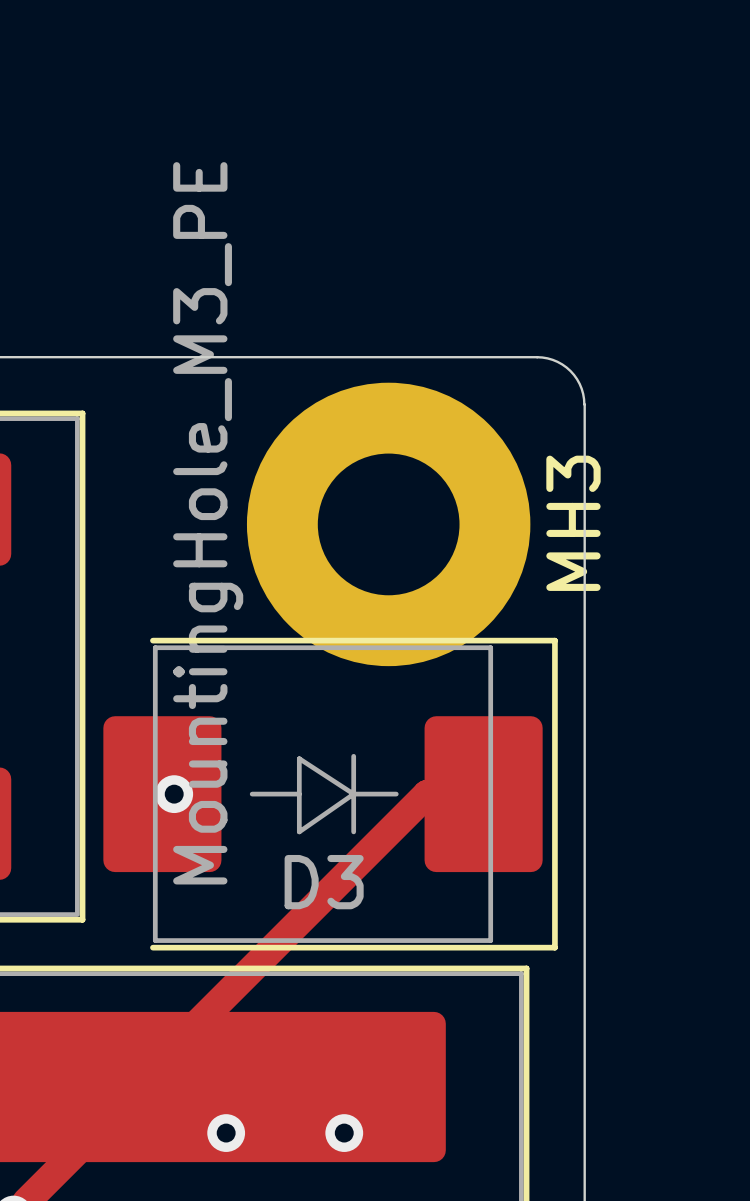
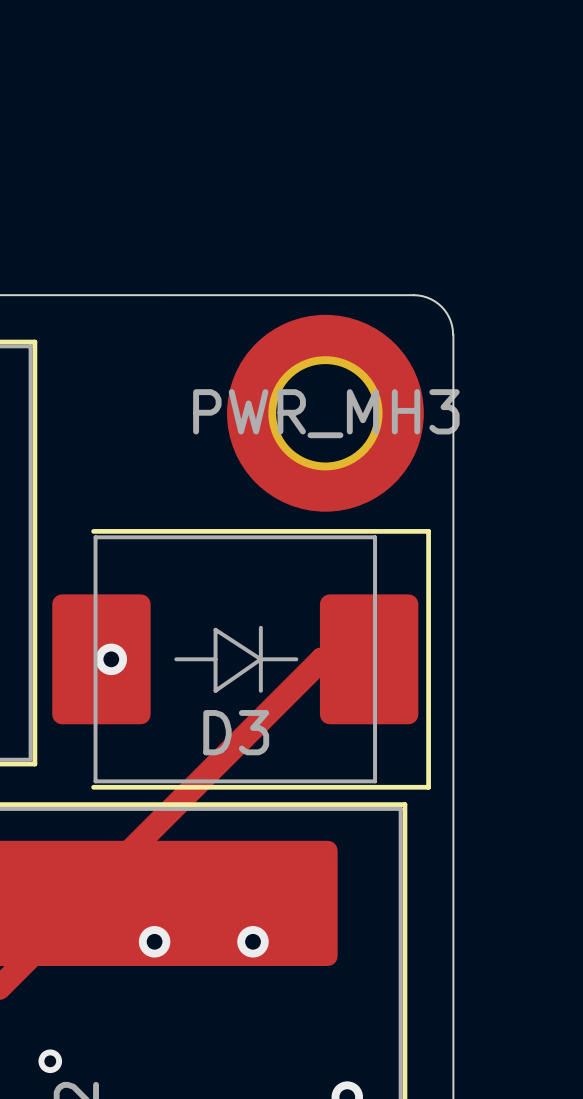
PWR_MH3: none -> (325, 413)
MH3: MountingHole_M3_PE (388, 524) -> none

